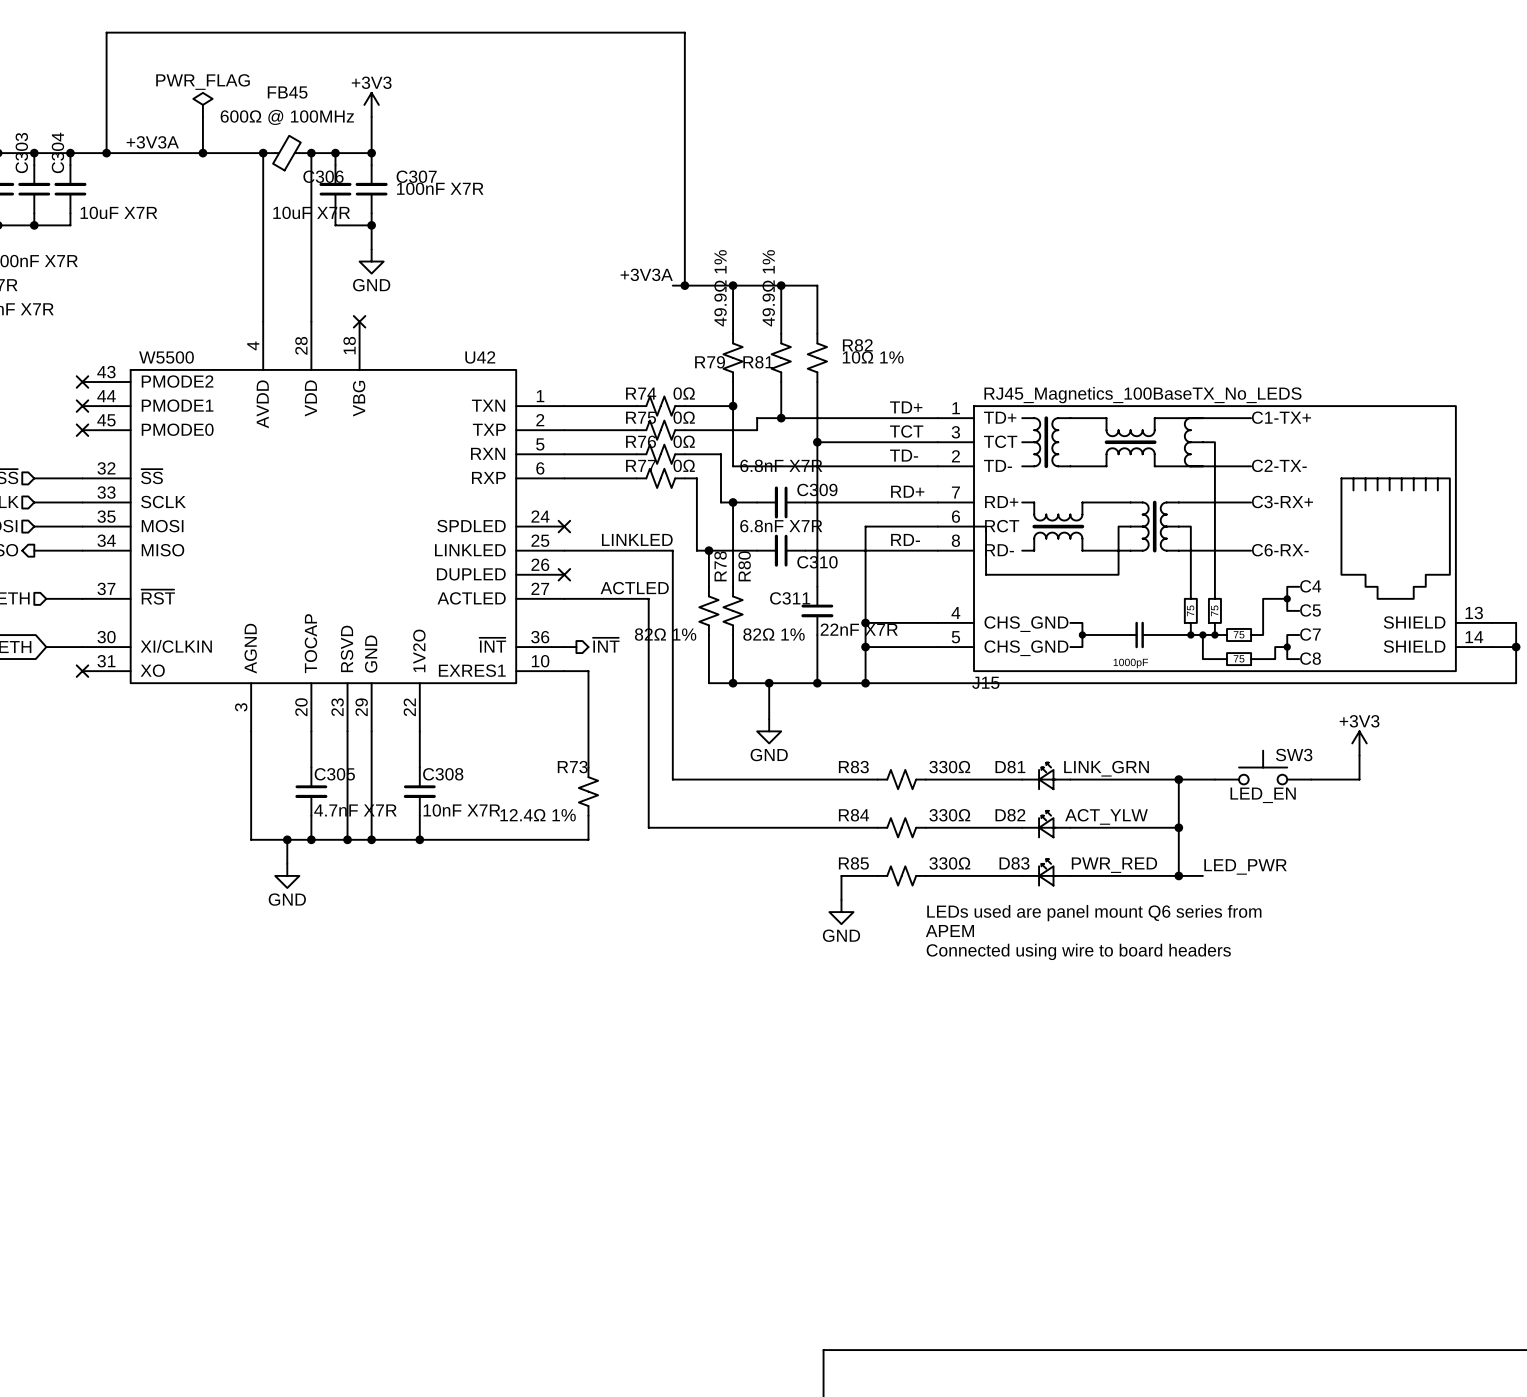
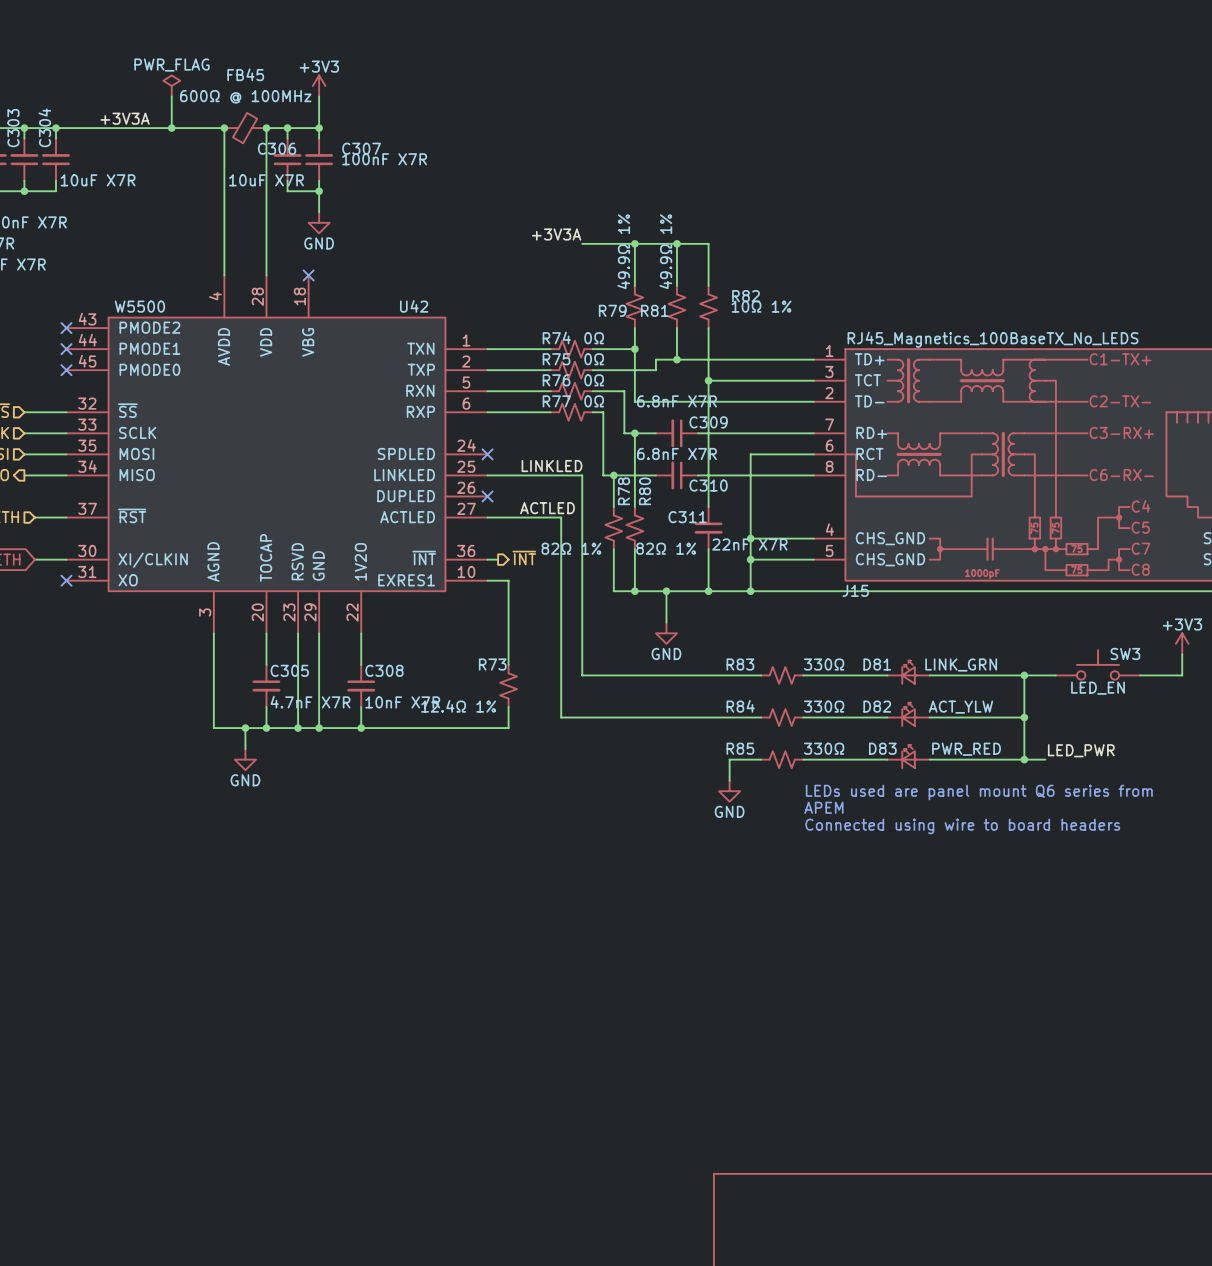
wire: (106, 153) (106, 32) (684, 32) (684, 285) -> none
junction: (106, 153) -> none
junction: (684, 285) -> none
label: TD+ (906, 407) -> none
label: TCT (906, 431) -> none
label: TD- (904, 455) -> none
label: RD+ (907, 491) -> none
label: RD- (905, 539) -> none

